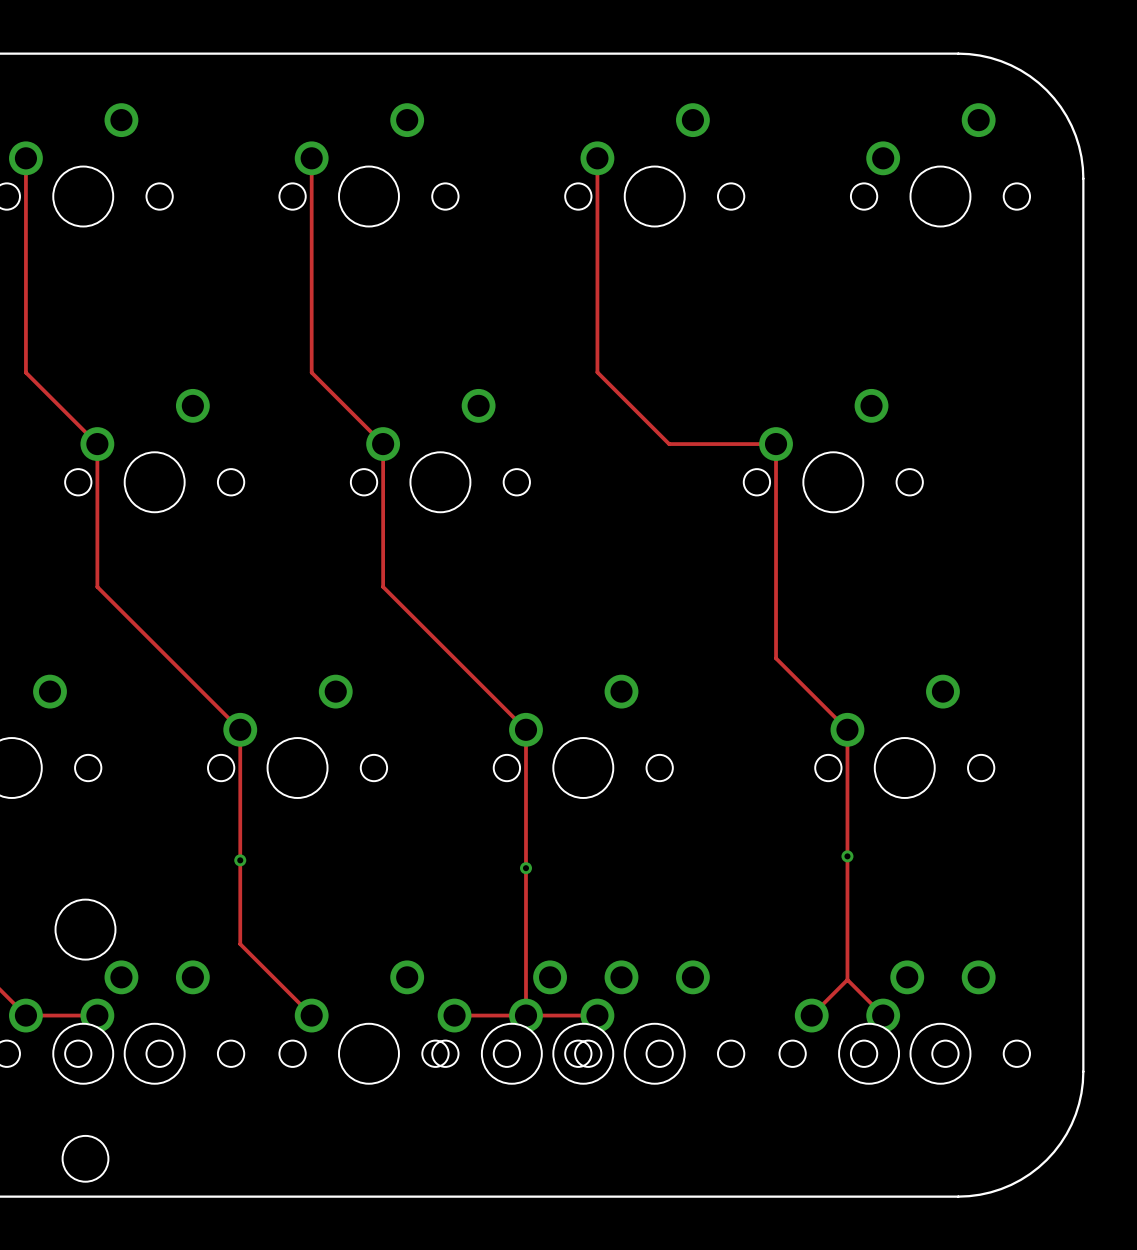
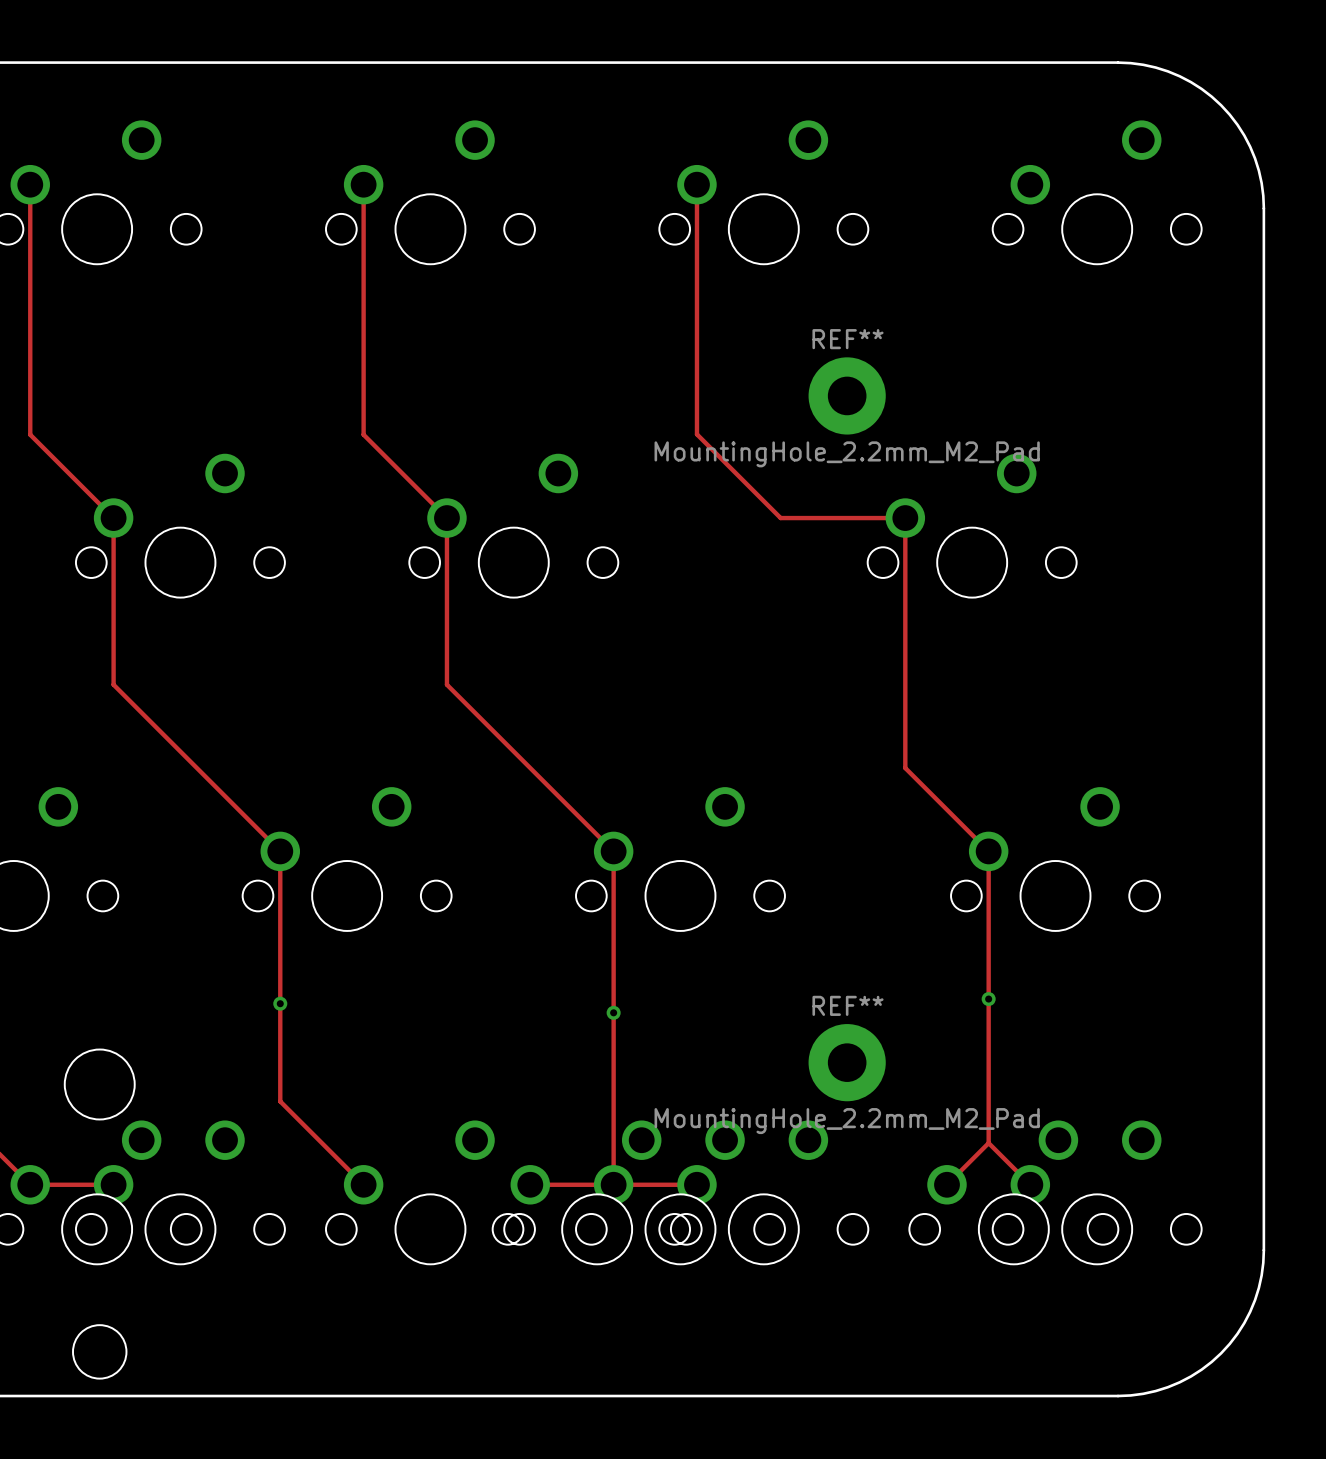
REF**: none -> MountingHole_2.2mm_M2_Pad (847, 395)
REF**: none -> MountingHole_2.2mm_M2_Pad (847, 1062)

